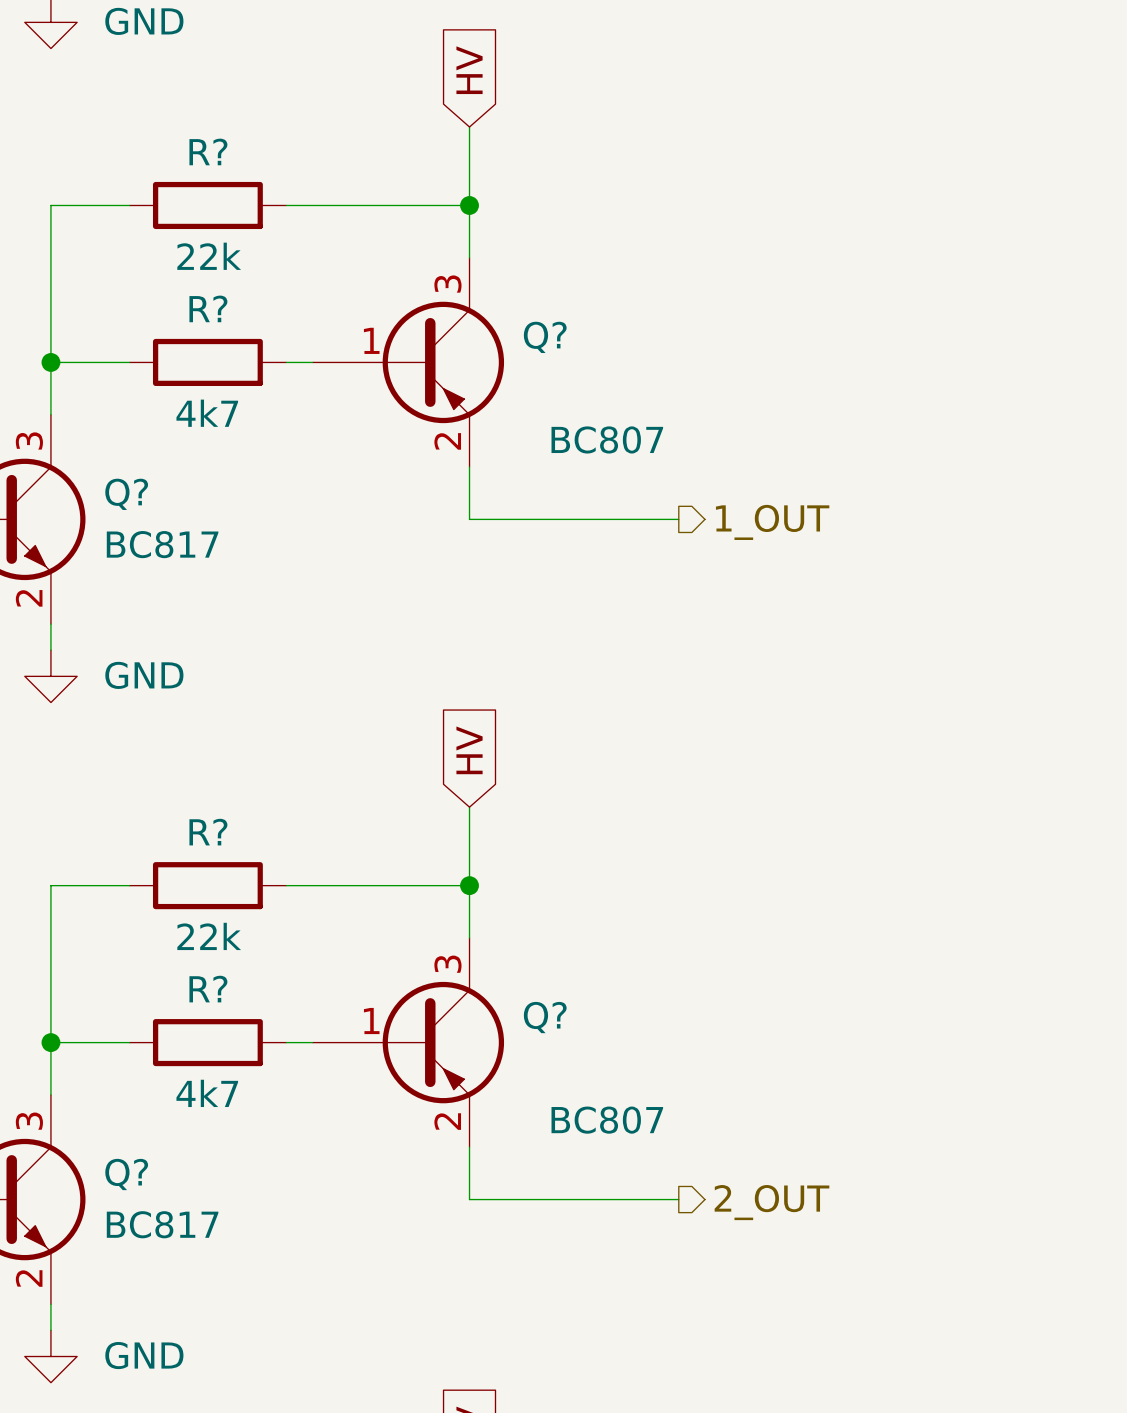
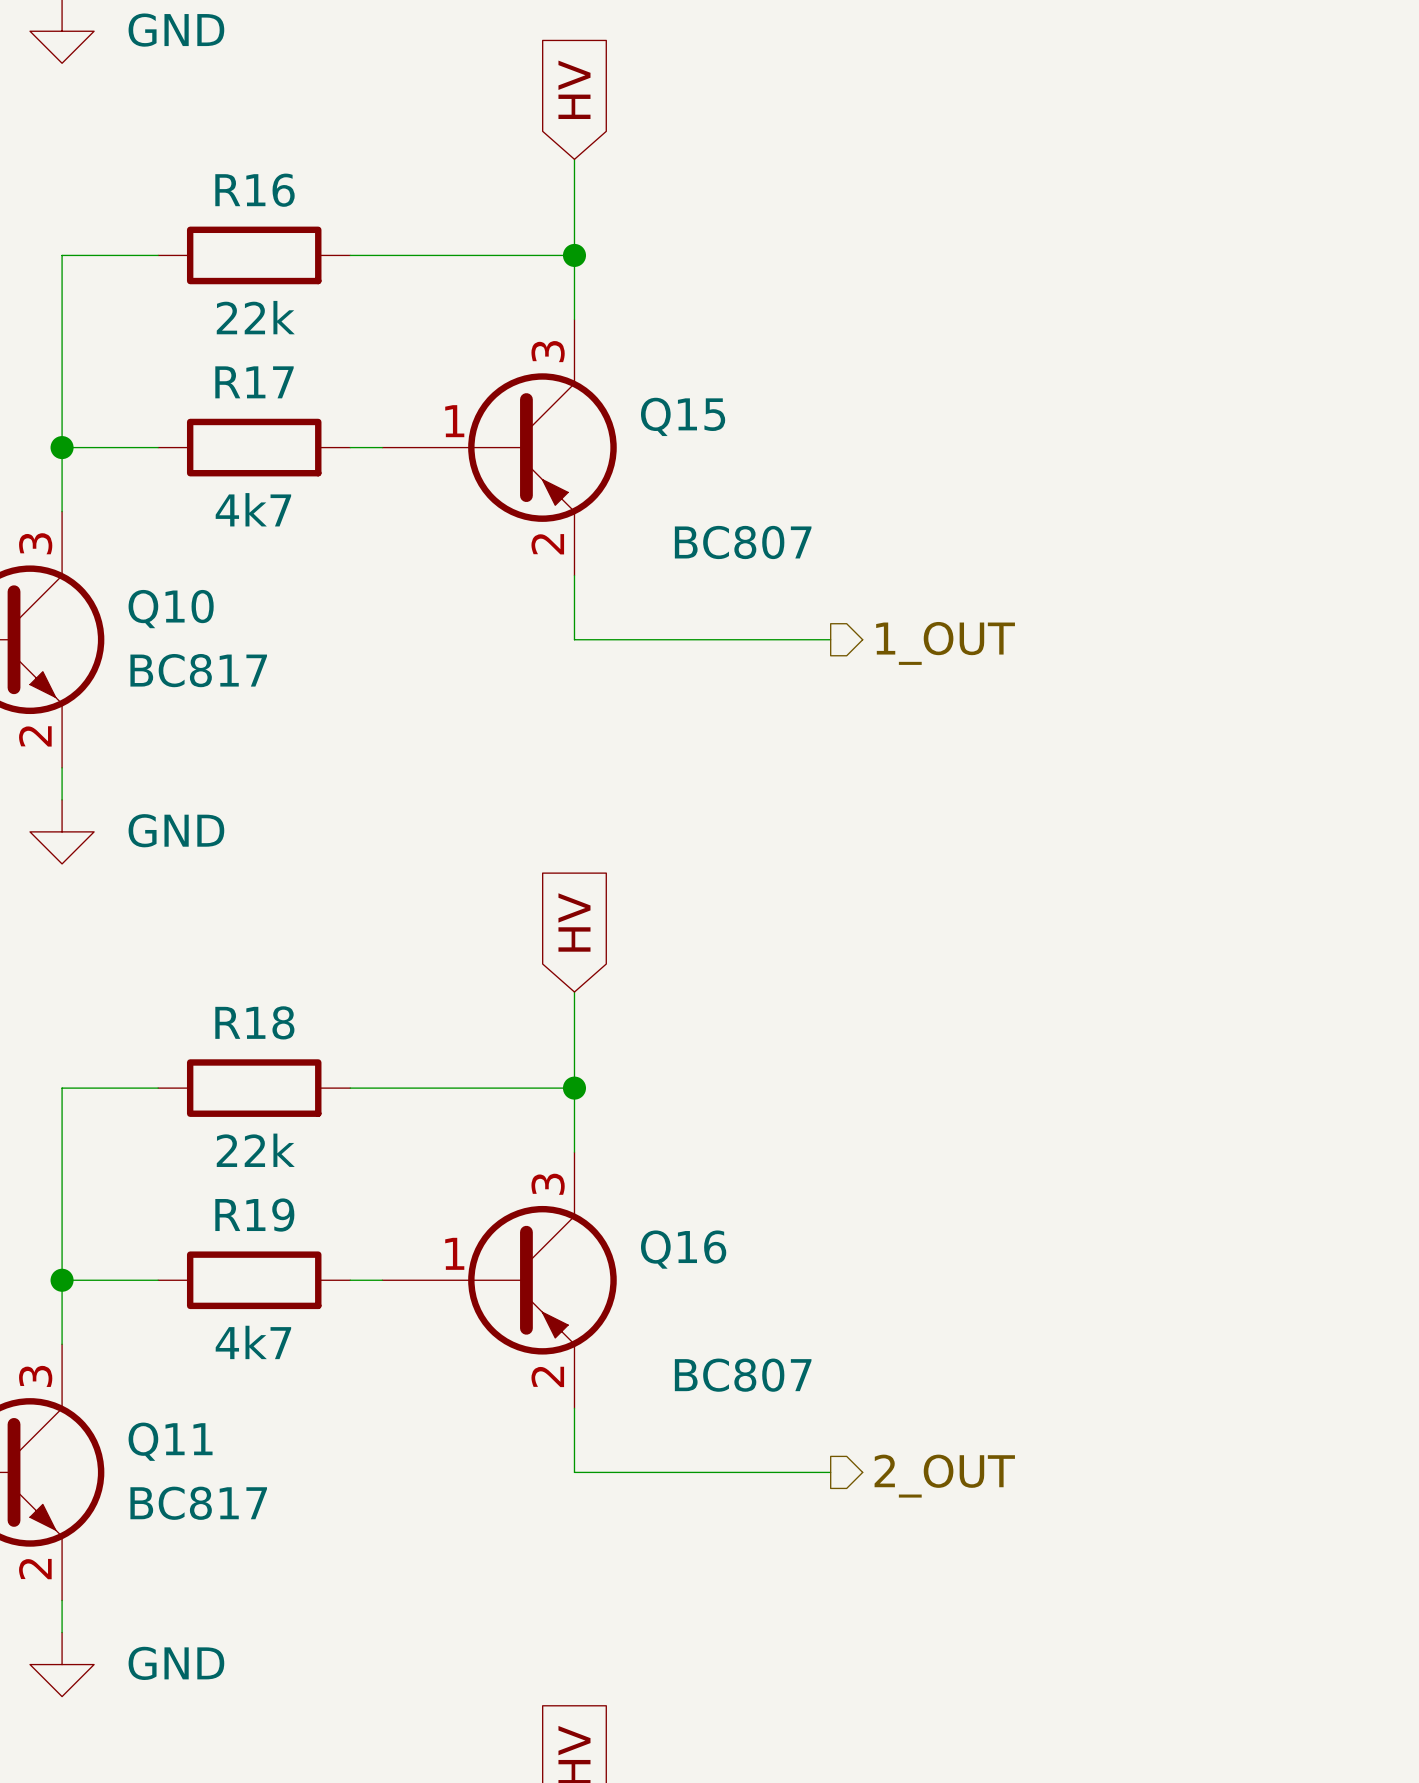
R? name: R? (208, 151) -> R16 (254, 190)
R? name: R? (208, 308) -> R17 (254, 382)
Q? name: Q? (545, 337) -> Q15 (683, 416)
Q? name: Q? (126, 494) -> Q10 (171, 609)
R? name: R? (208, 832) -> R18 (254, 1022)
R? name: R? (208, 989) -> R19 (254, 1215)
Q? name: Q? (545, 1017) -> Q16 (683, 1249)
Q? name: Q? (126, 1174) -> Q11 (170, 1441)

